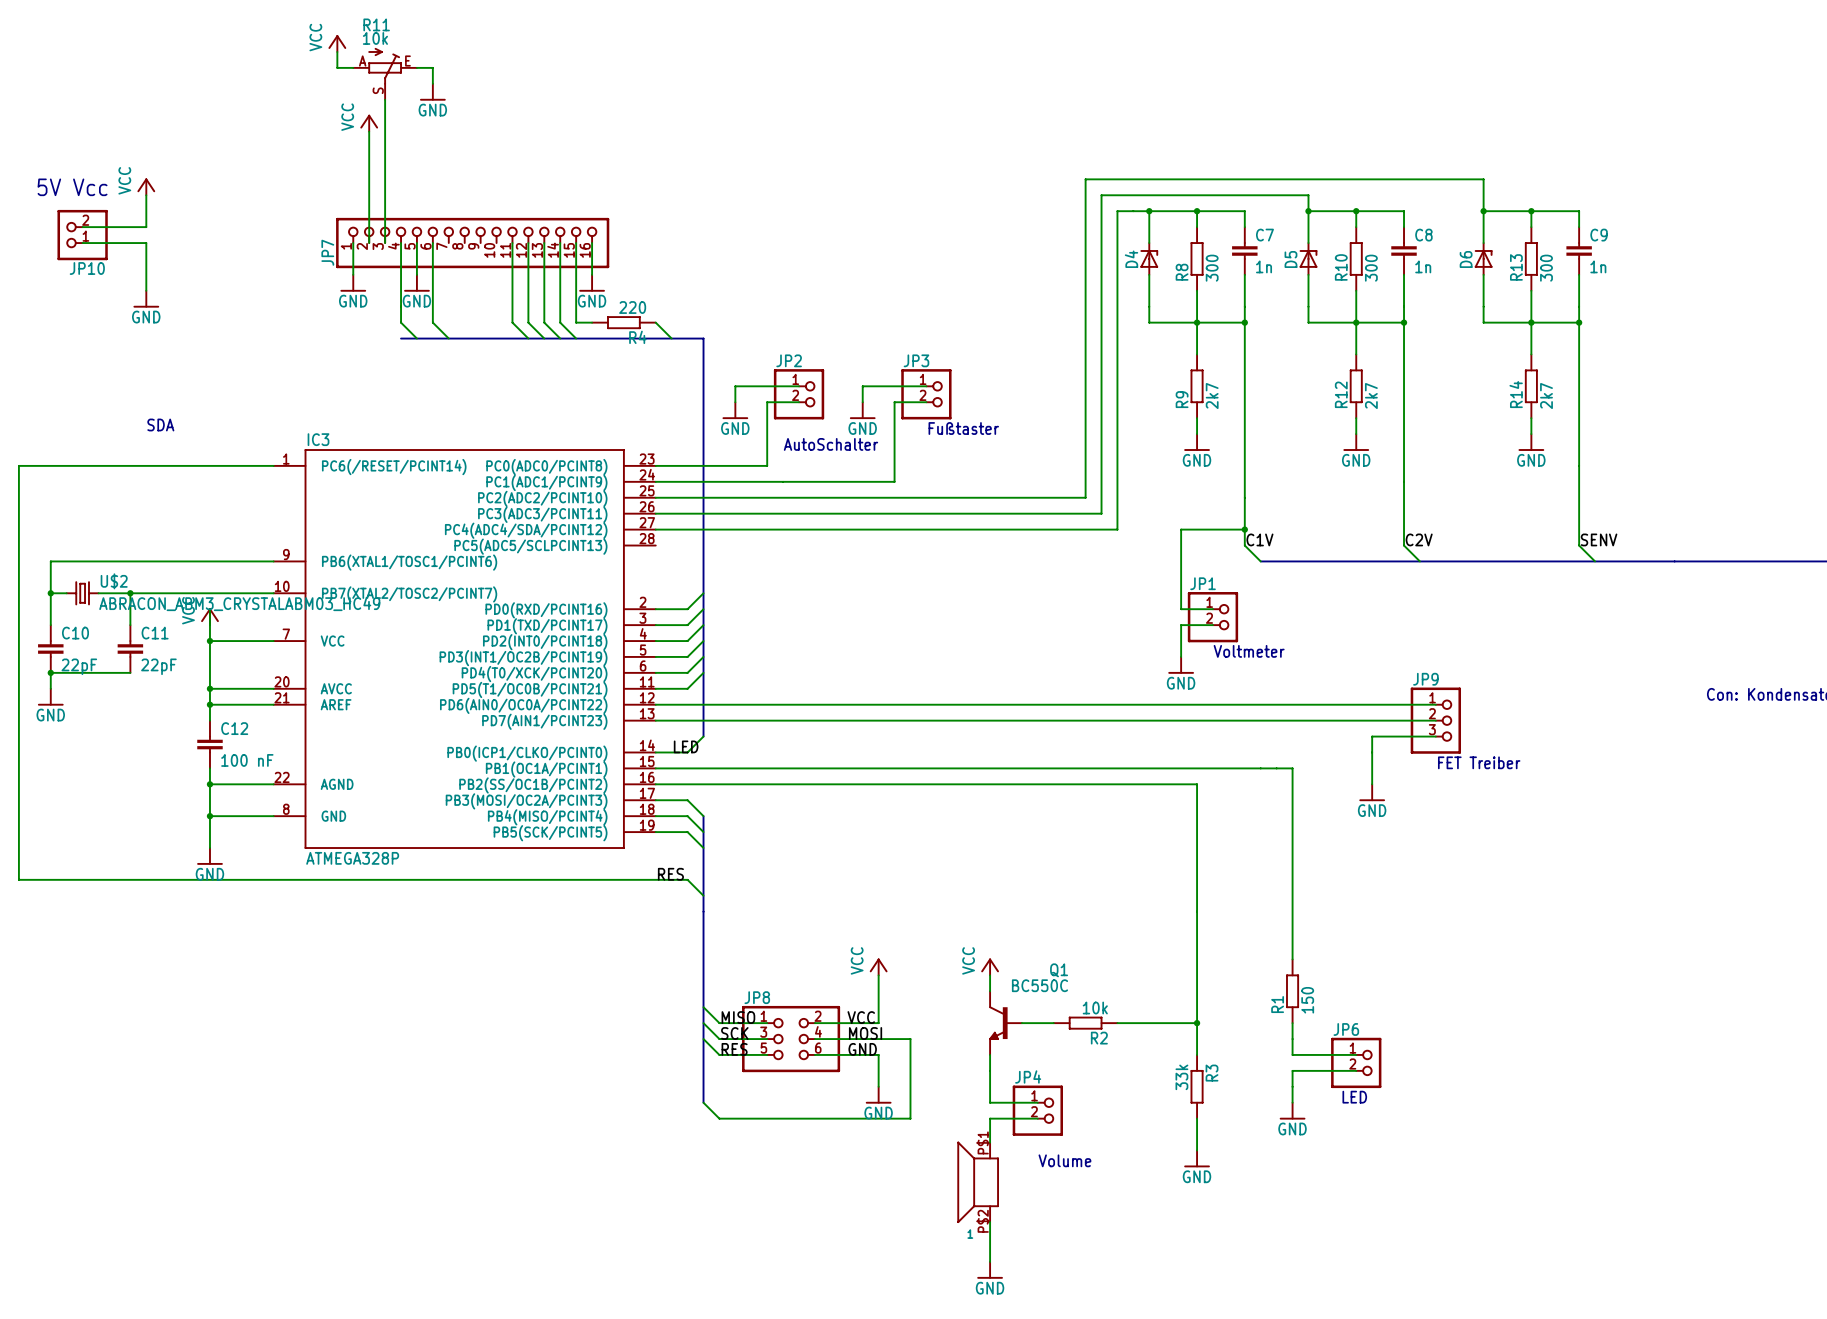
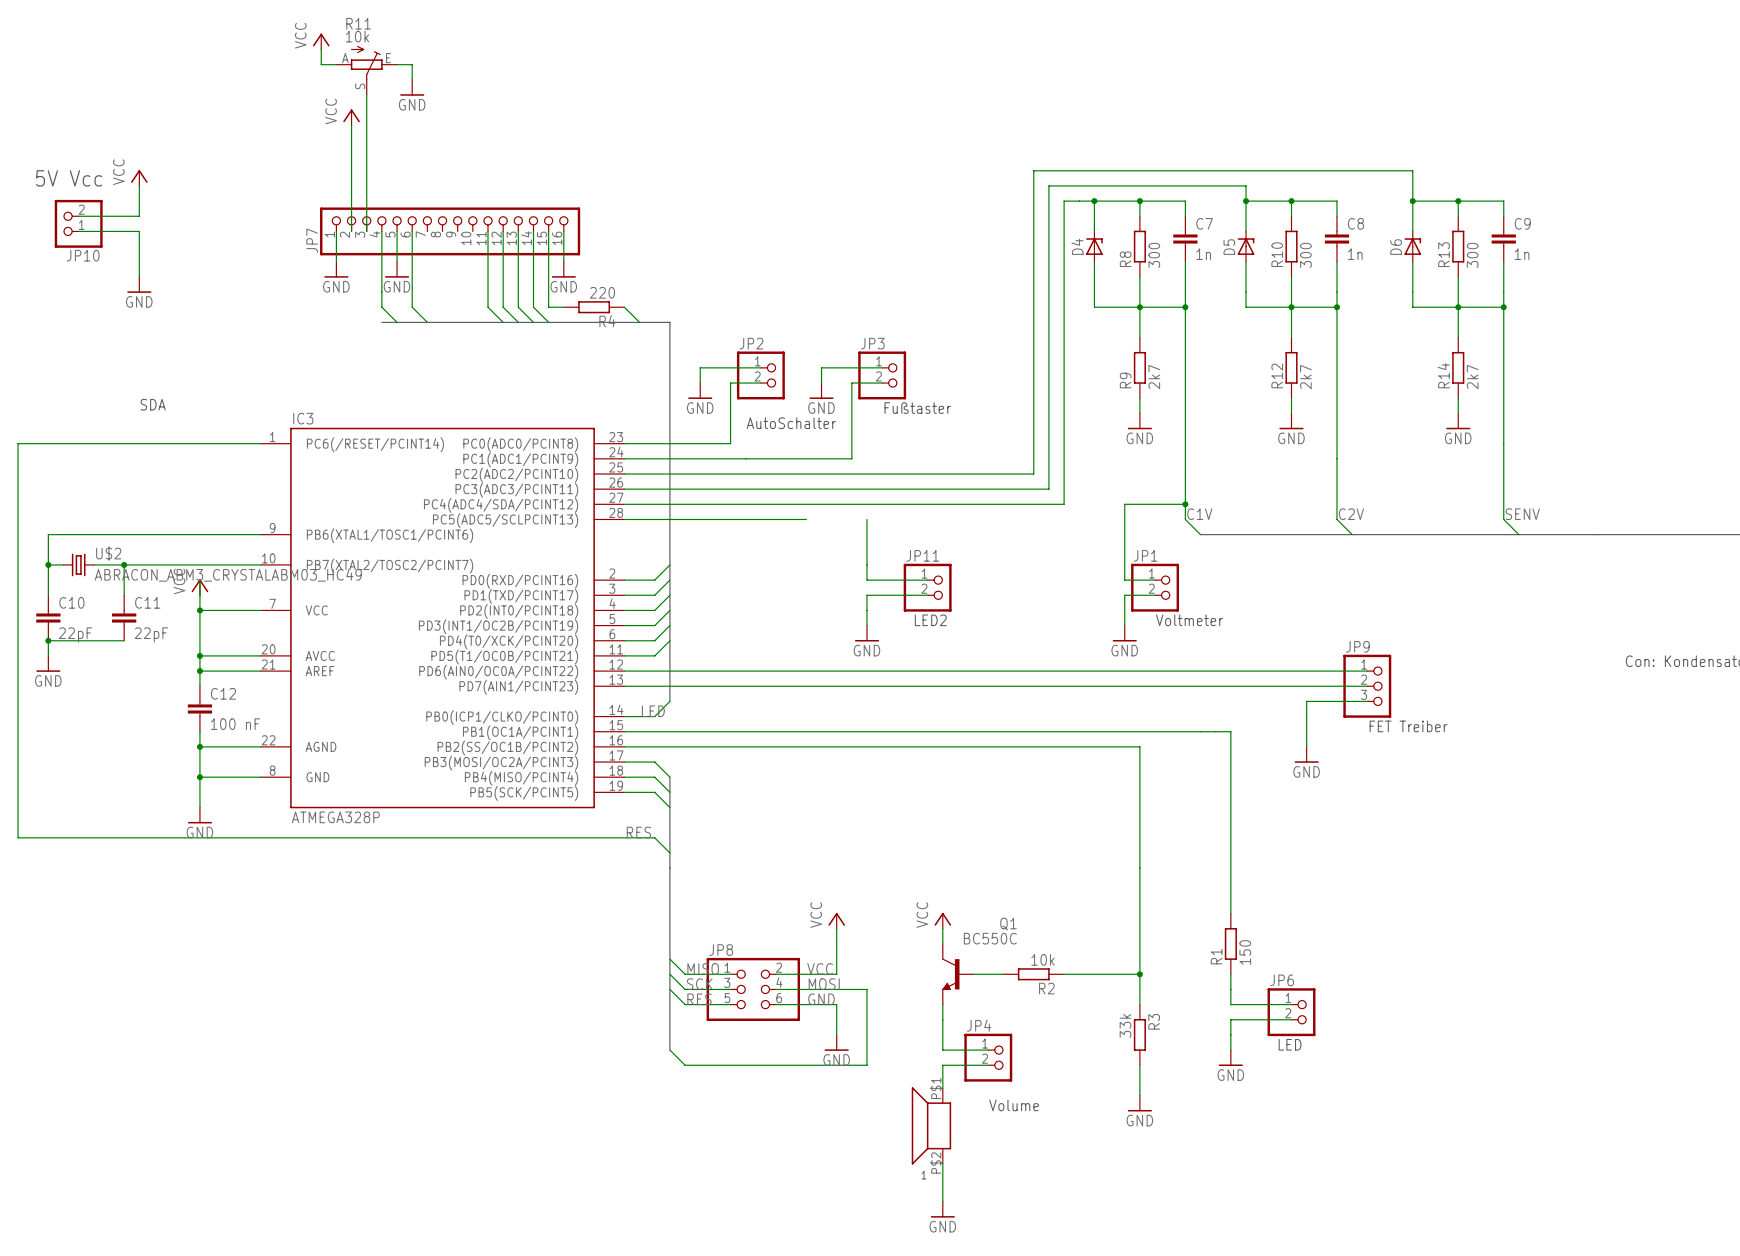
wire: none -> (624, 519) (806, 519)
wire: none -> (867, 519) (867, 580) (927, 580)
JP11: none -> (927, 587)
wire: none -> (927, 595) (867, 595) (867, 625)
text: none -> LED2 (930, 620)
power symbol: none -> GND (867, 633)

